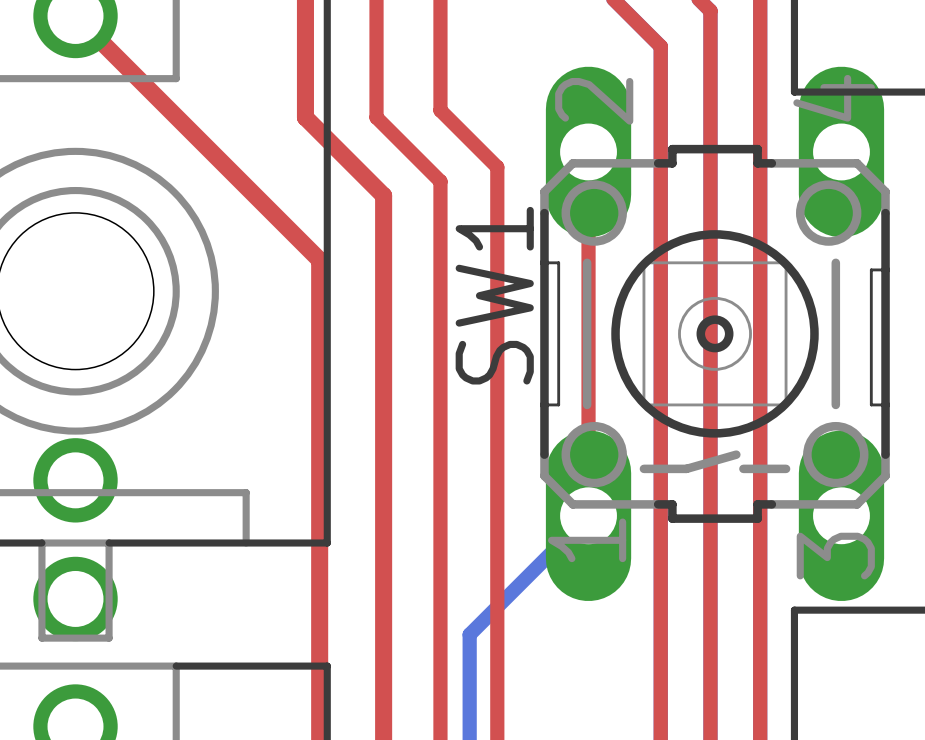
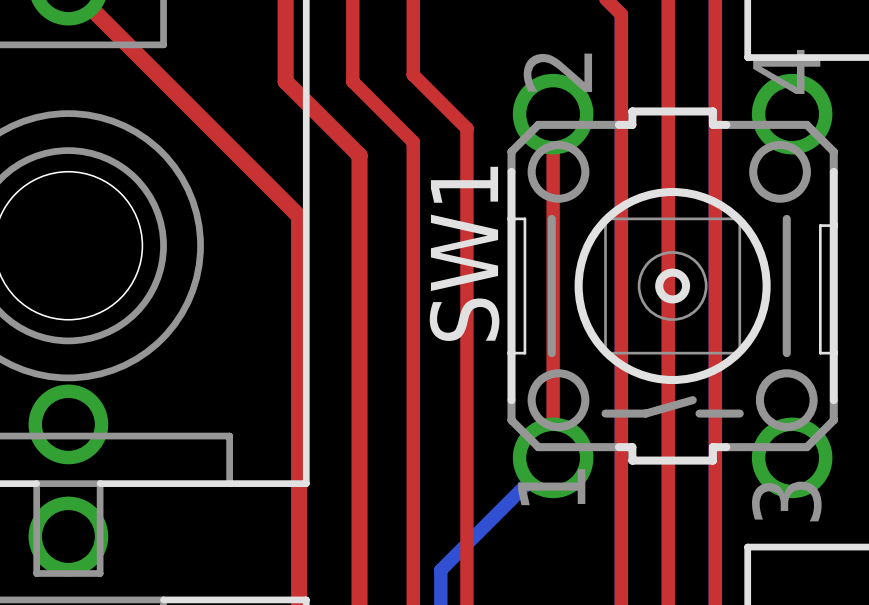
SW1 footprint: [540, 66, 890, 602] -> [507, 73, 838, 499]

